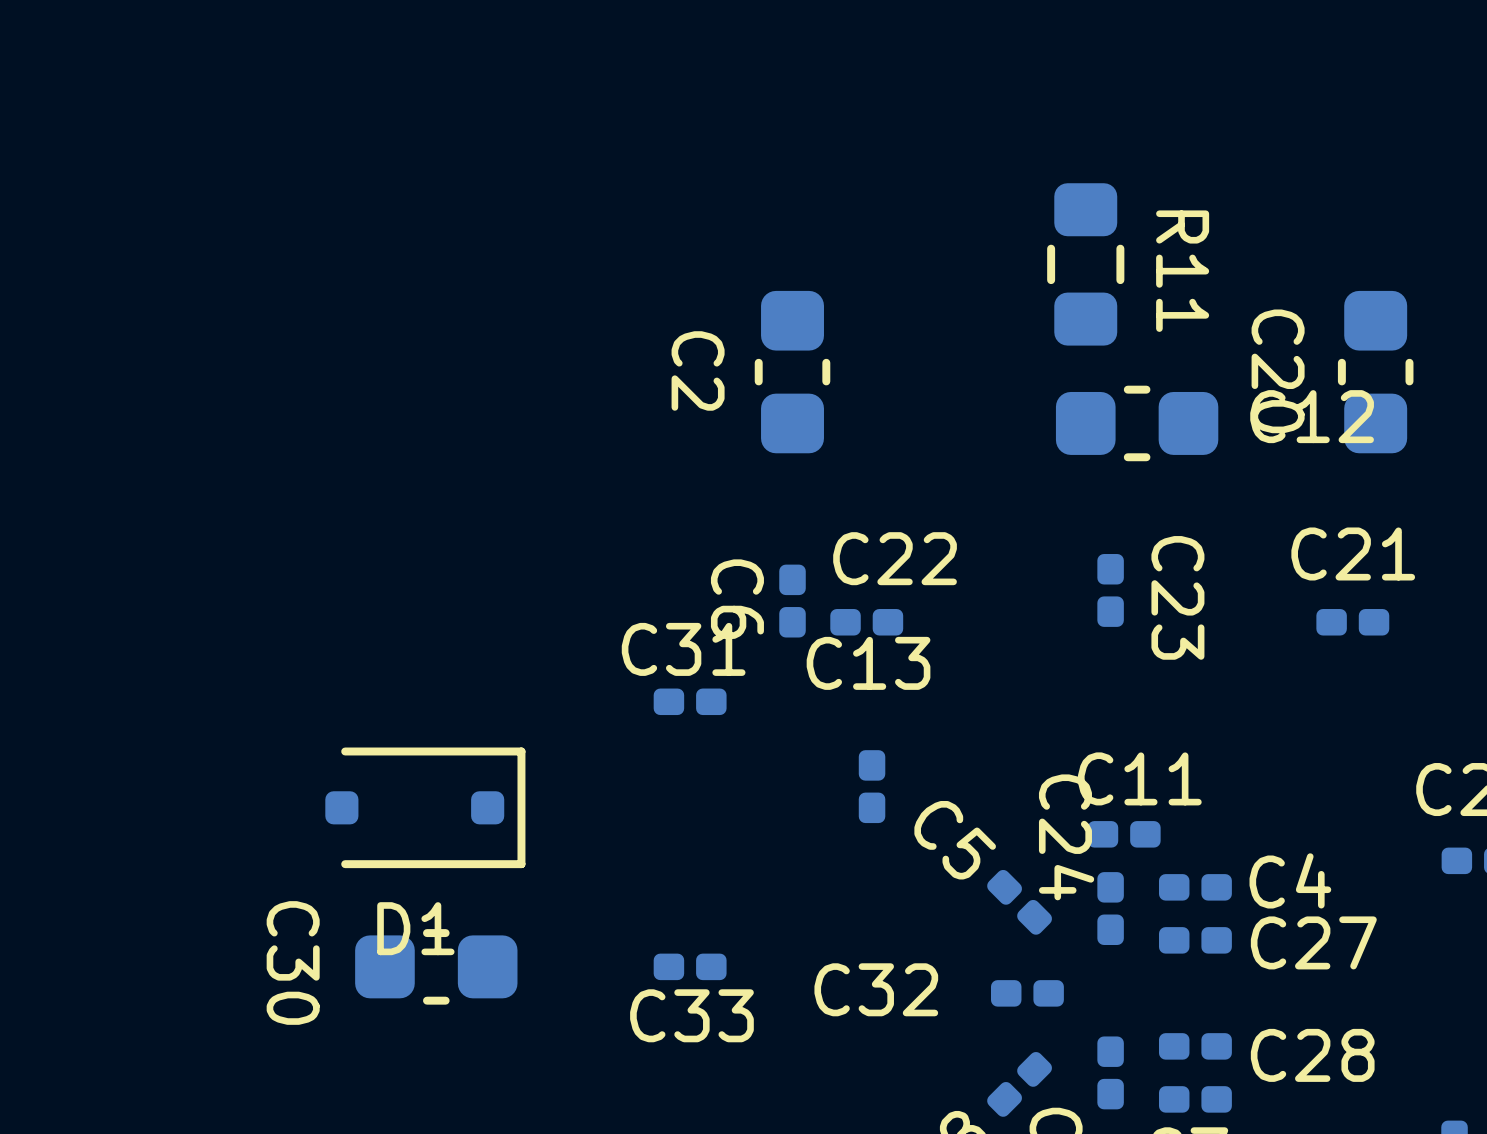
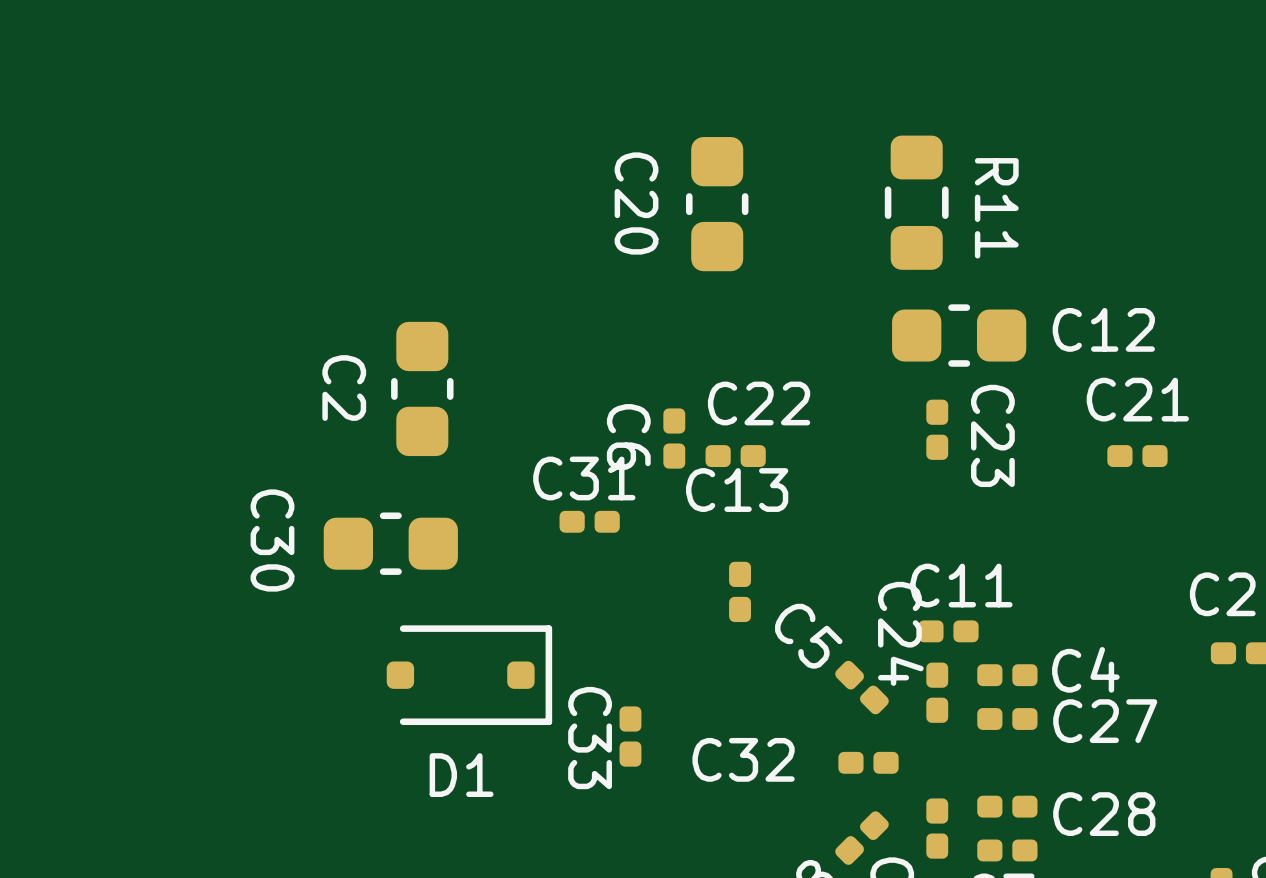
R11 position: (1085, 264) -> (916, 202)
C2 position: (792, 372) -> (422, 388)
C20 position: (1375, 372) -> (717, 204)
C12 position: (1137, 423) -> (959, 335)
D1 position: (425, 807) -> (469, 675)
C30 position: (436, 966) -> (390, 543)
C33 rotation: 0° (690, 966) -> 90° clockwise (630, 736)
C33 position: (690, 966) -> (630, 736)

